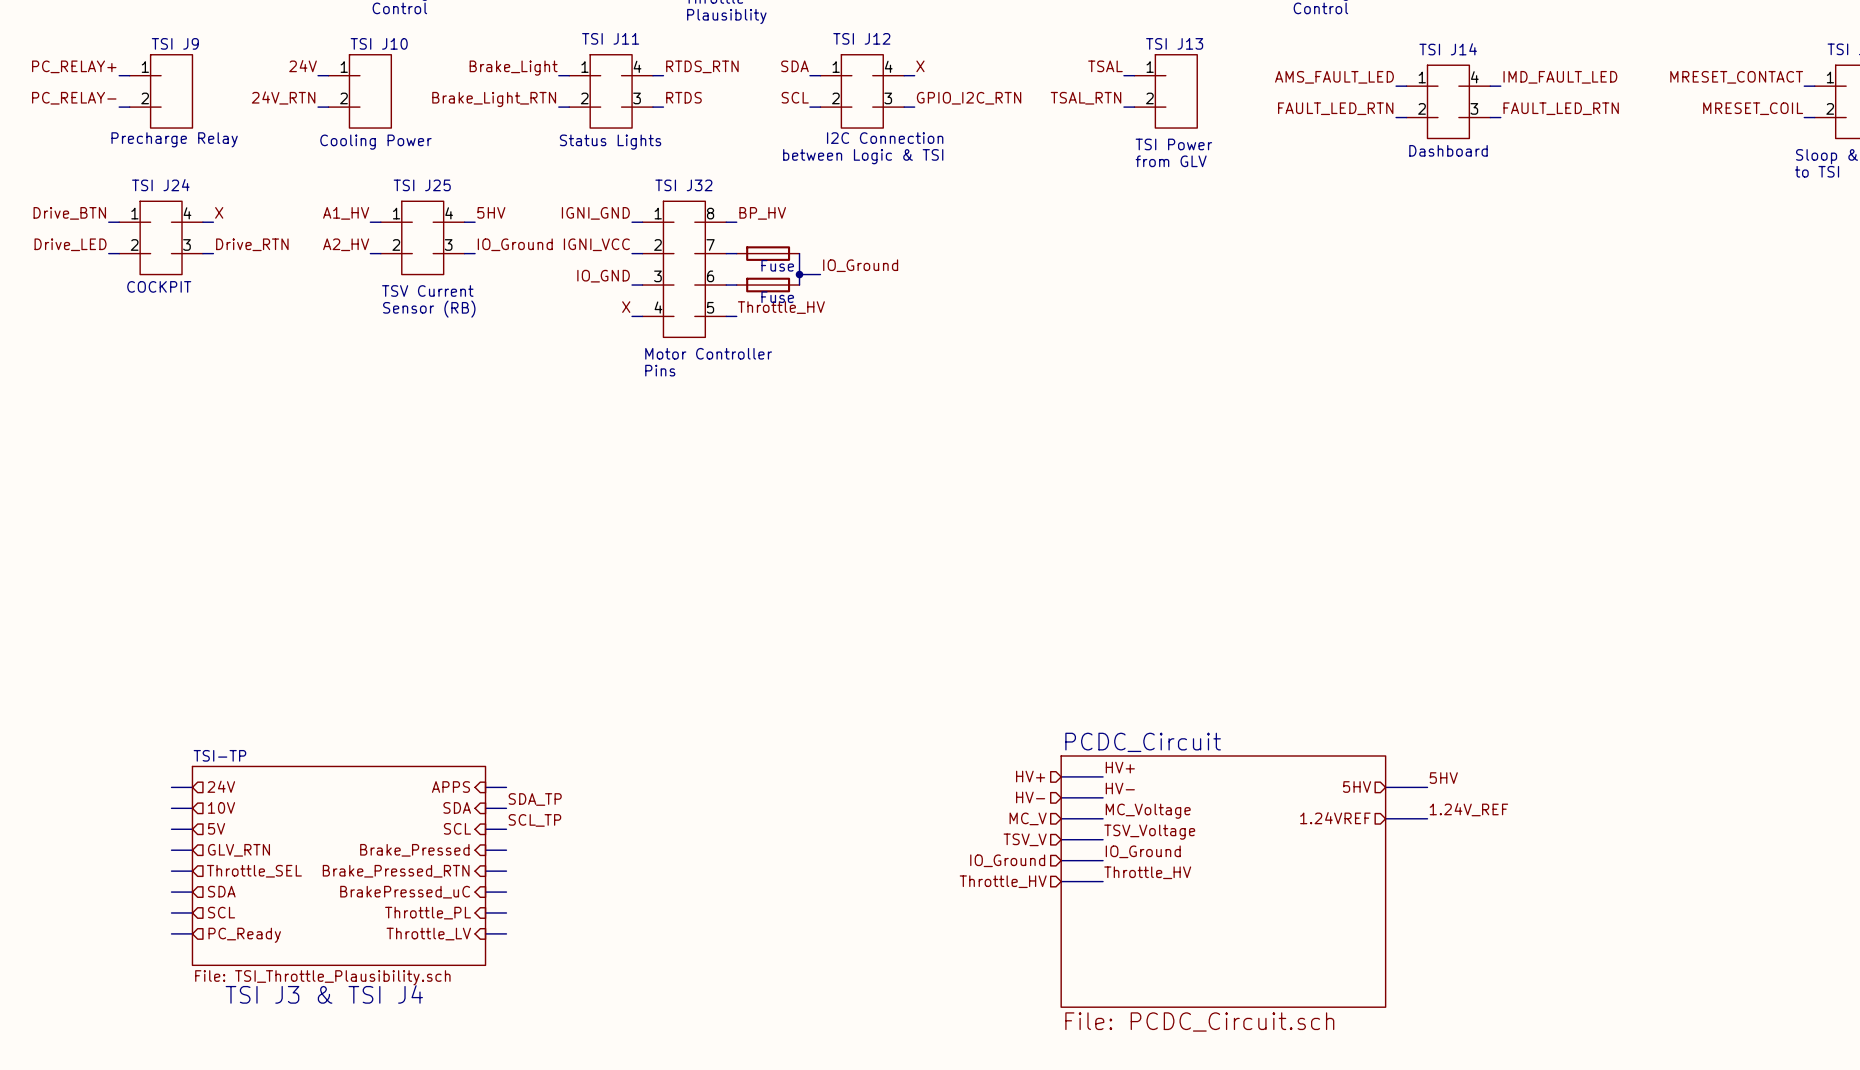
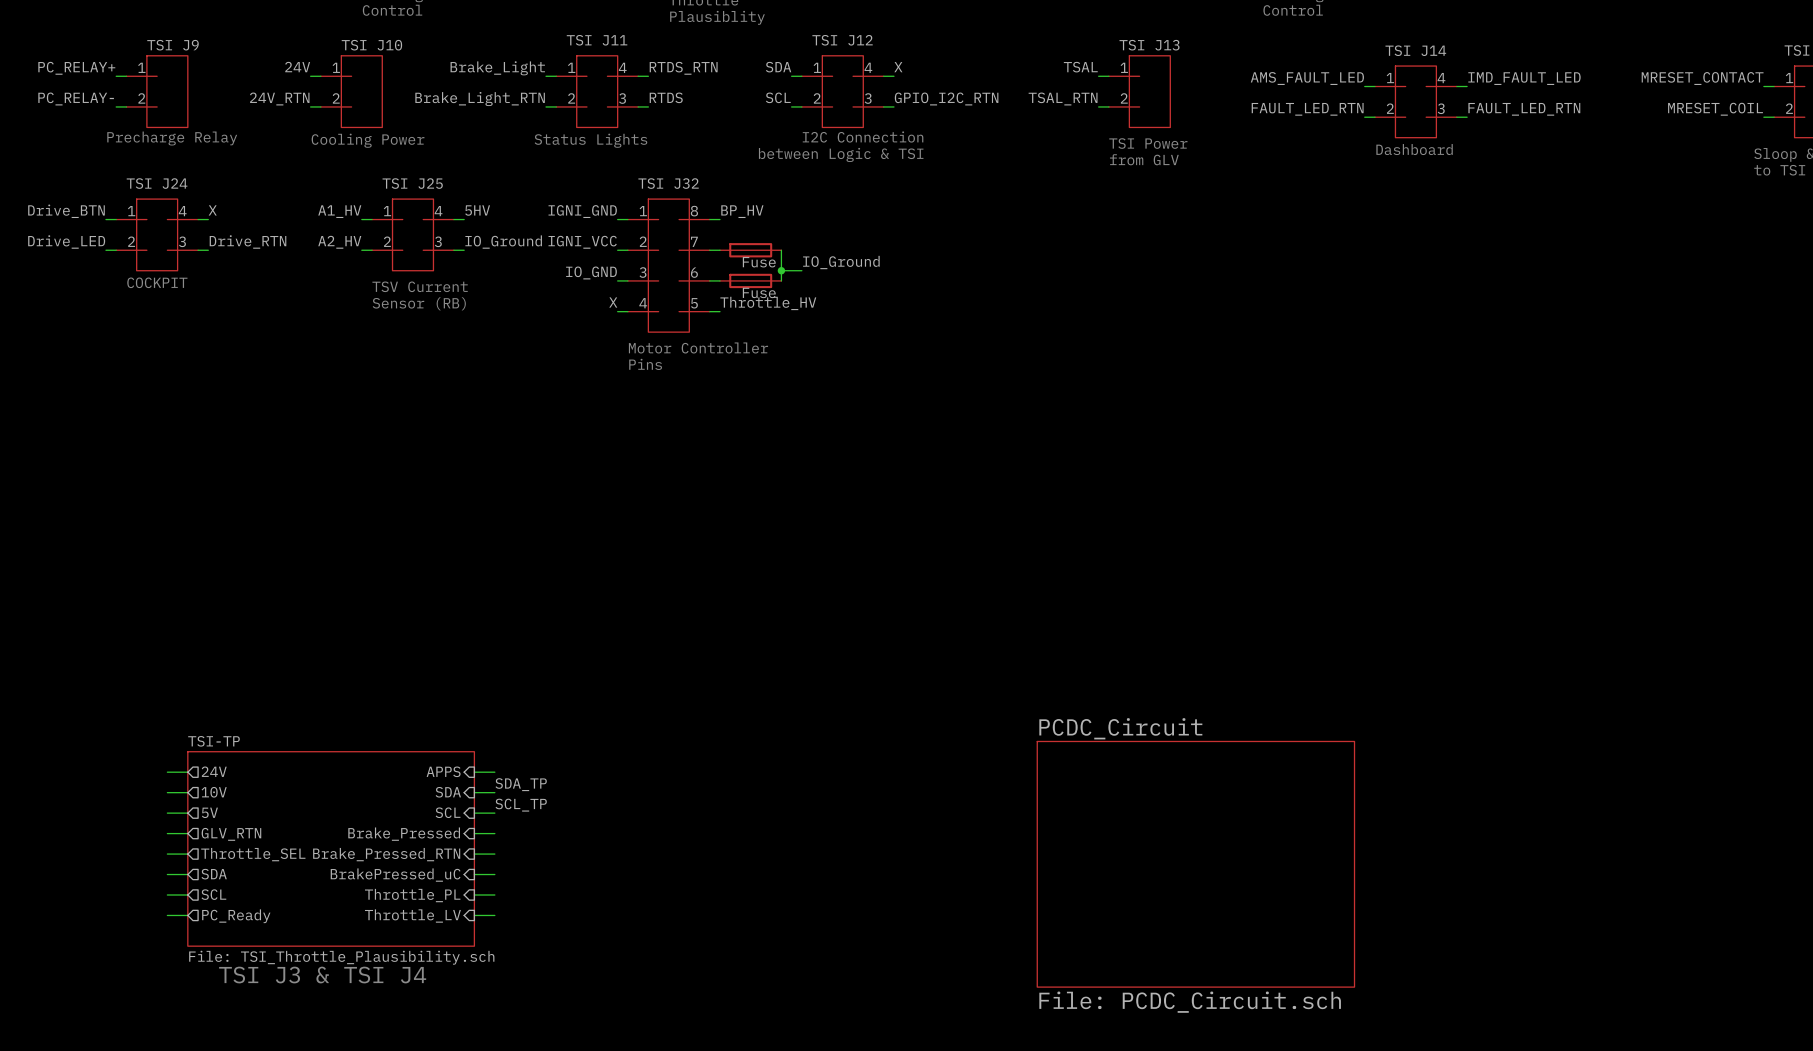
label: HV+ (1120, 767) -> none
hierarchical label: HV+ (1030, 776) -> none
wire: (1061, 776) (1103, 776) -> none
label: 5HV (1443, 778) -> none
hierarchical label: 5HV (1357, 787) -> none
wire: (1385, 787) (1427, 787) -> none
label: HV- (1120, 788) -> none
hierarchical label: HV- (1030, 797) -> none
wire: (1061, 797) (1103, 797) -> none
label: 1.24V_REF (1468, 809) -> none
label: MC_Voltage (1148, 811) -> none
hierarchical label: MC_V (1028, 818) -> none
wire: (1061, 818) (1103, 818) -> none
hierarchical label: 1.24VREF (1335, 818) -> none
wire: (1385, 818) (1427, 818) -> none
label: TSV_Voltage (1149, 832) -> none
hierarchical label: TSV_V (1025, 839) -> none
wire: (1061, 839) (1103, 839) -> none
label: IO_Ground (1143, 851) -> none
hierarchical label: IO_Ground (1007, 860) -> none
wire: (1061, 860) (1103, 860) -> none
label: Throttle_HV (1147, 872) -> none
hierarchical label: Throttle_HV (1003, 881) -> none
wire: (1061, 881) (1103, 881) -> none

